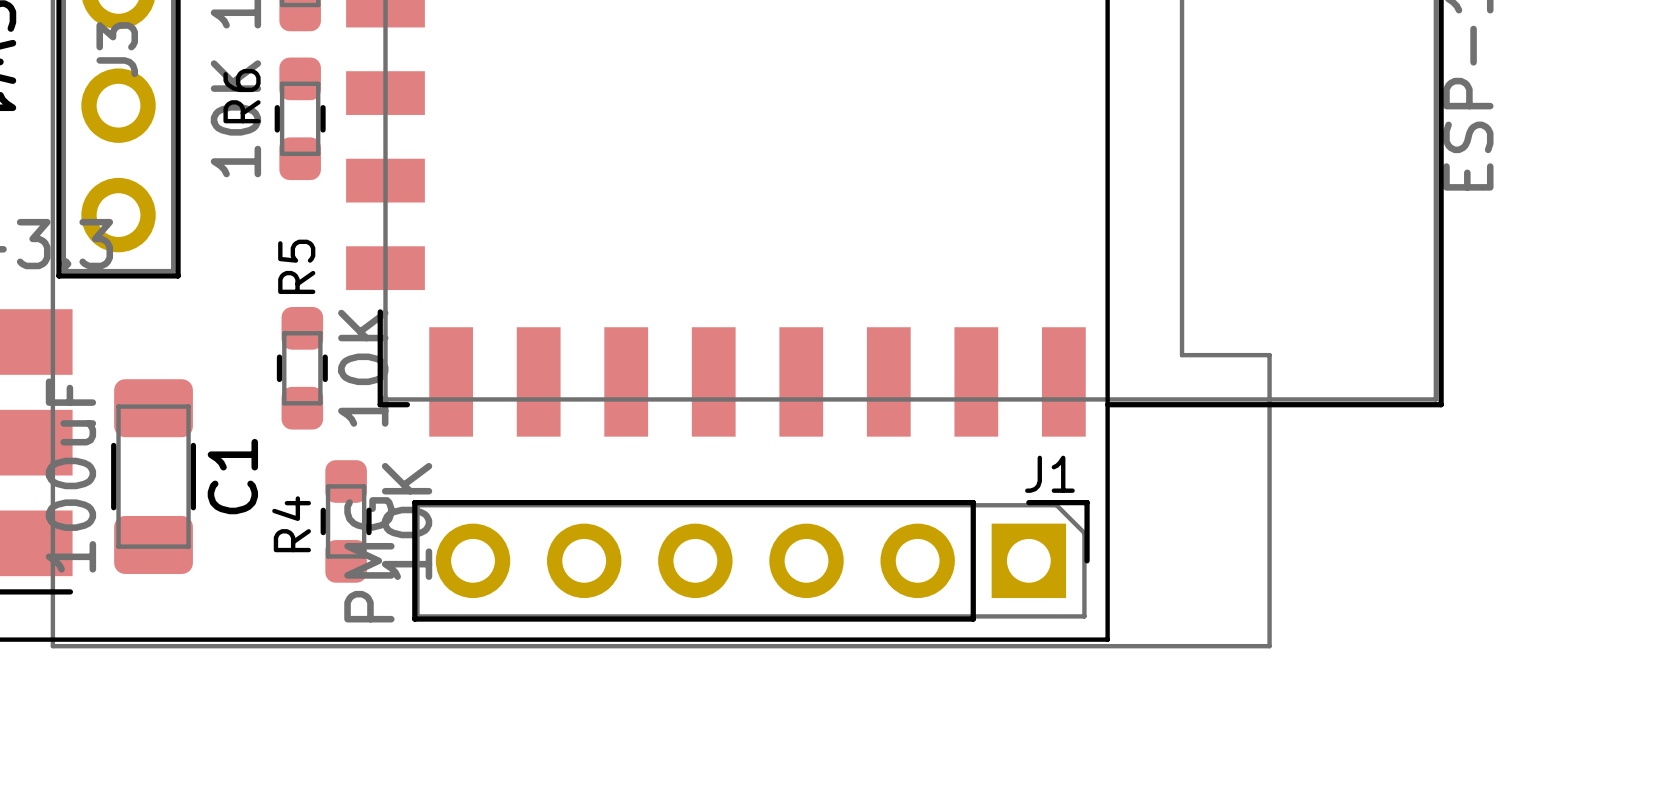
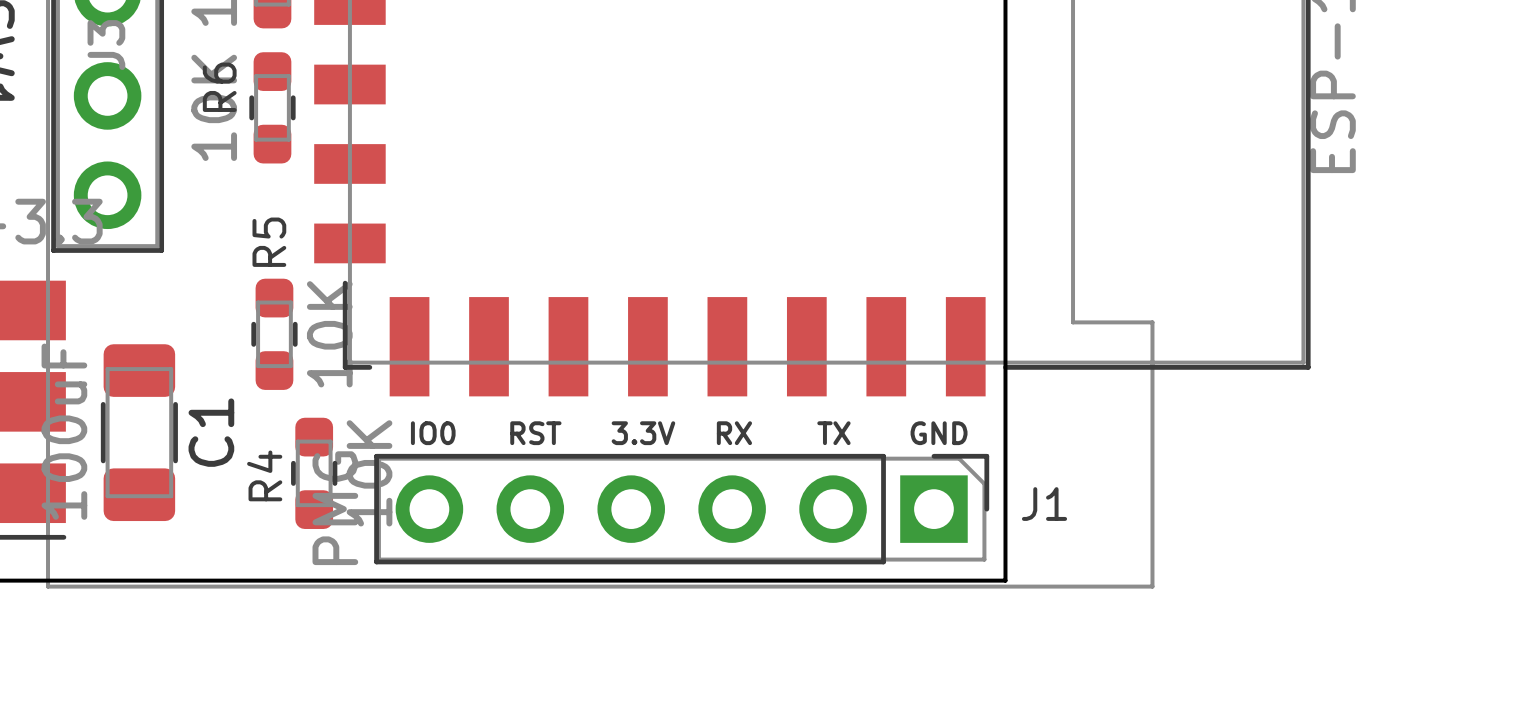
J1 name position: J1 (1049, 474) -> J1 (1044, 504)
text: none -> IO0 (433, 433)
text: none -> RST (535, 433)
text: none -> 3.3V (643, 433)
text: none -> RX (734, 433)
text: none -> TX (833, 433)
text: none -> GND (939, 433)

